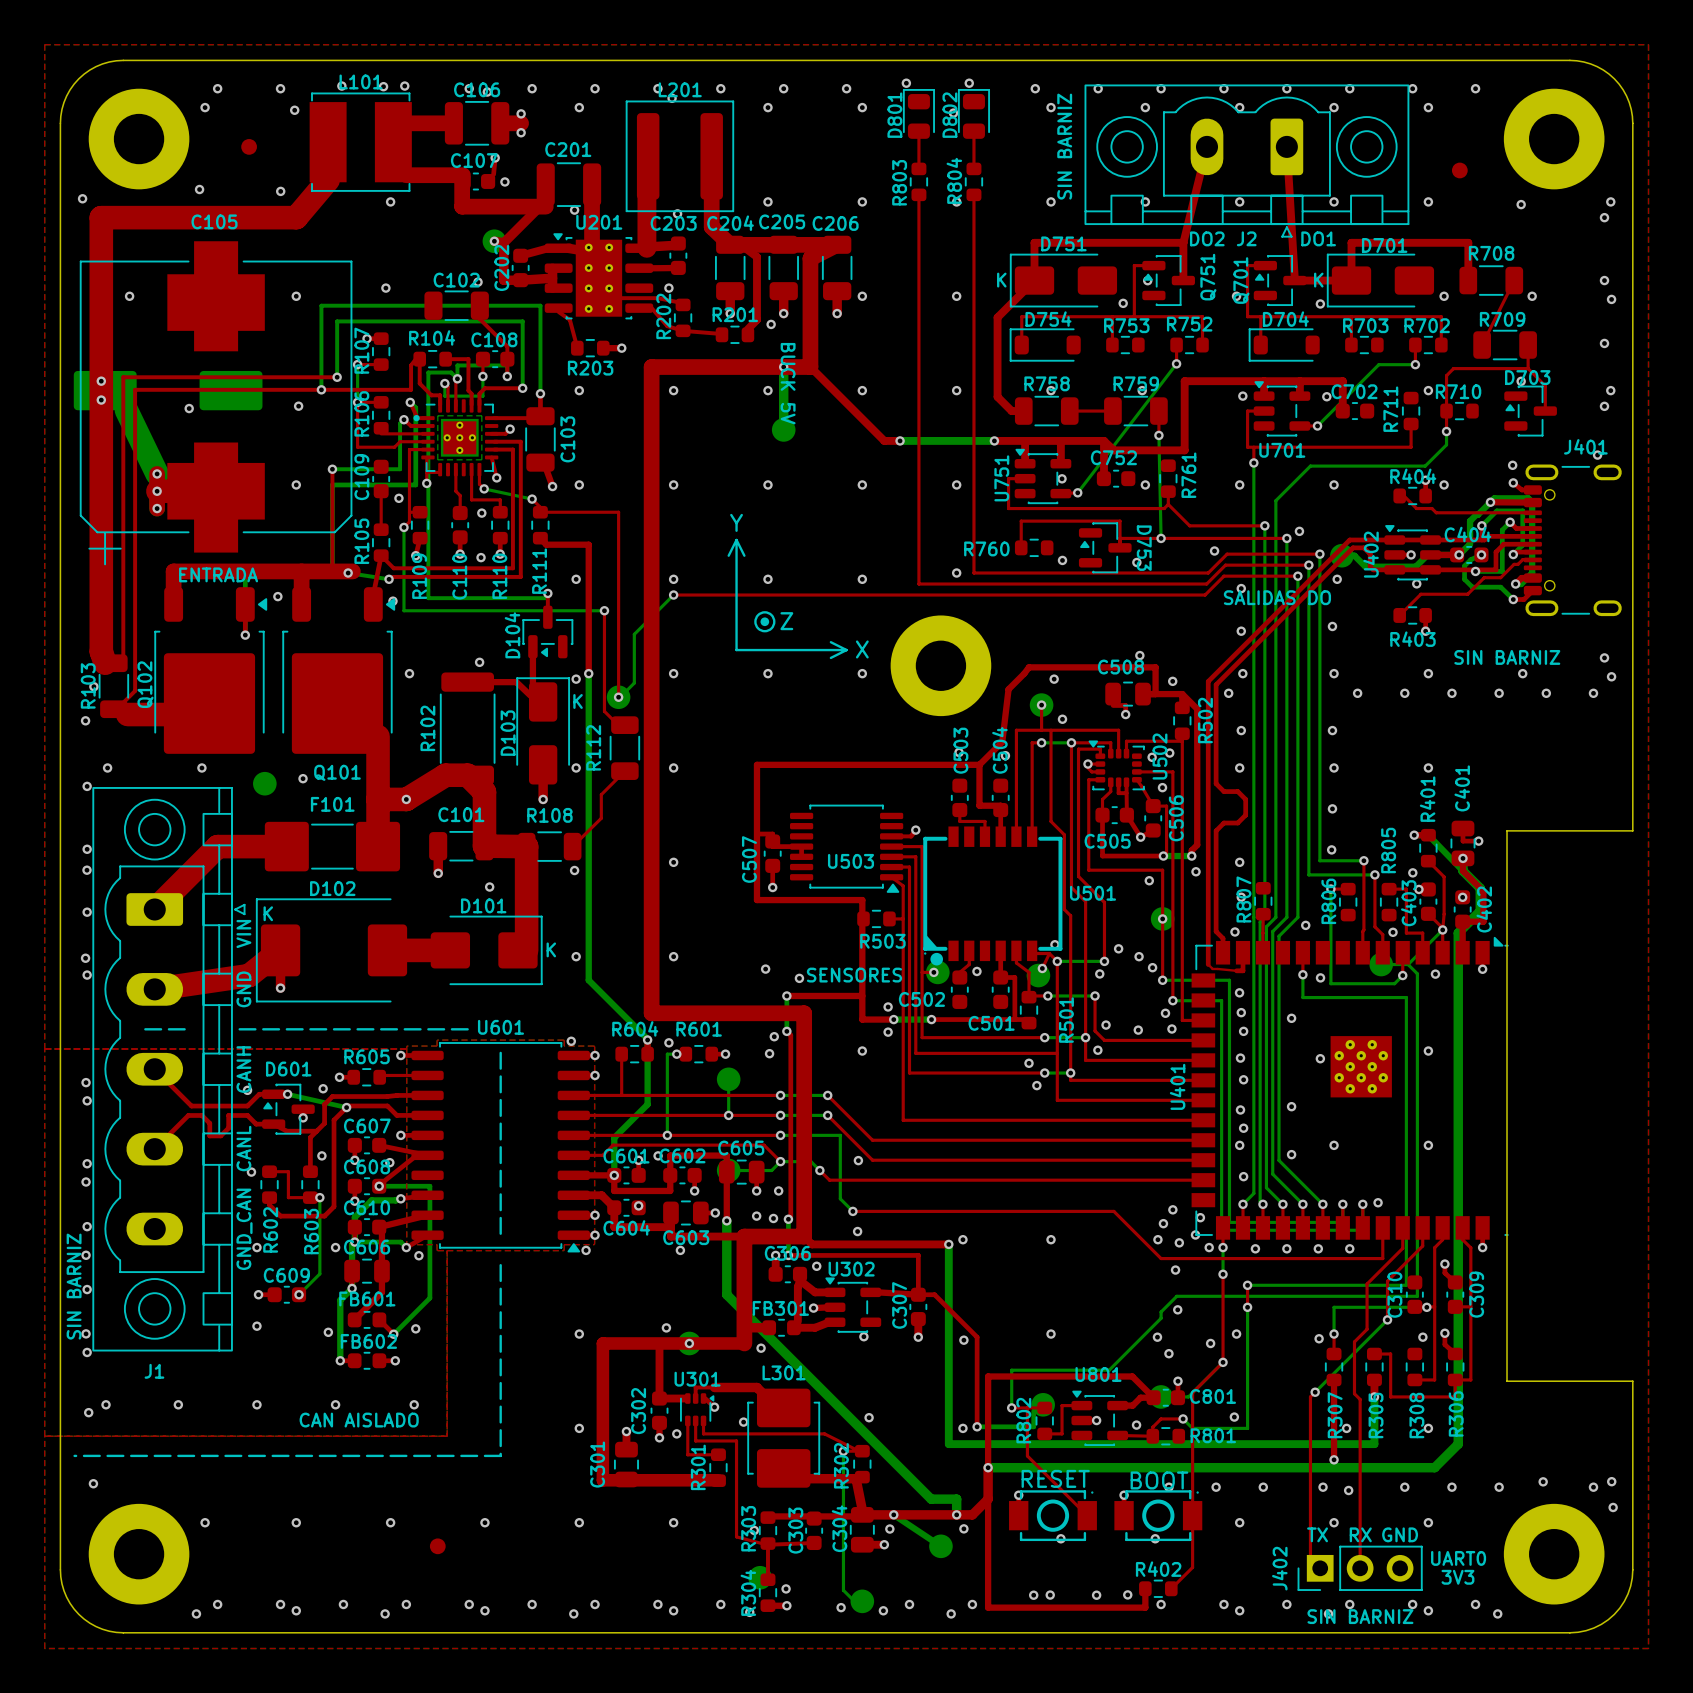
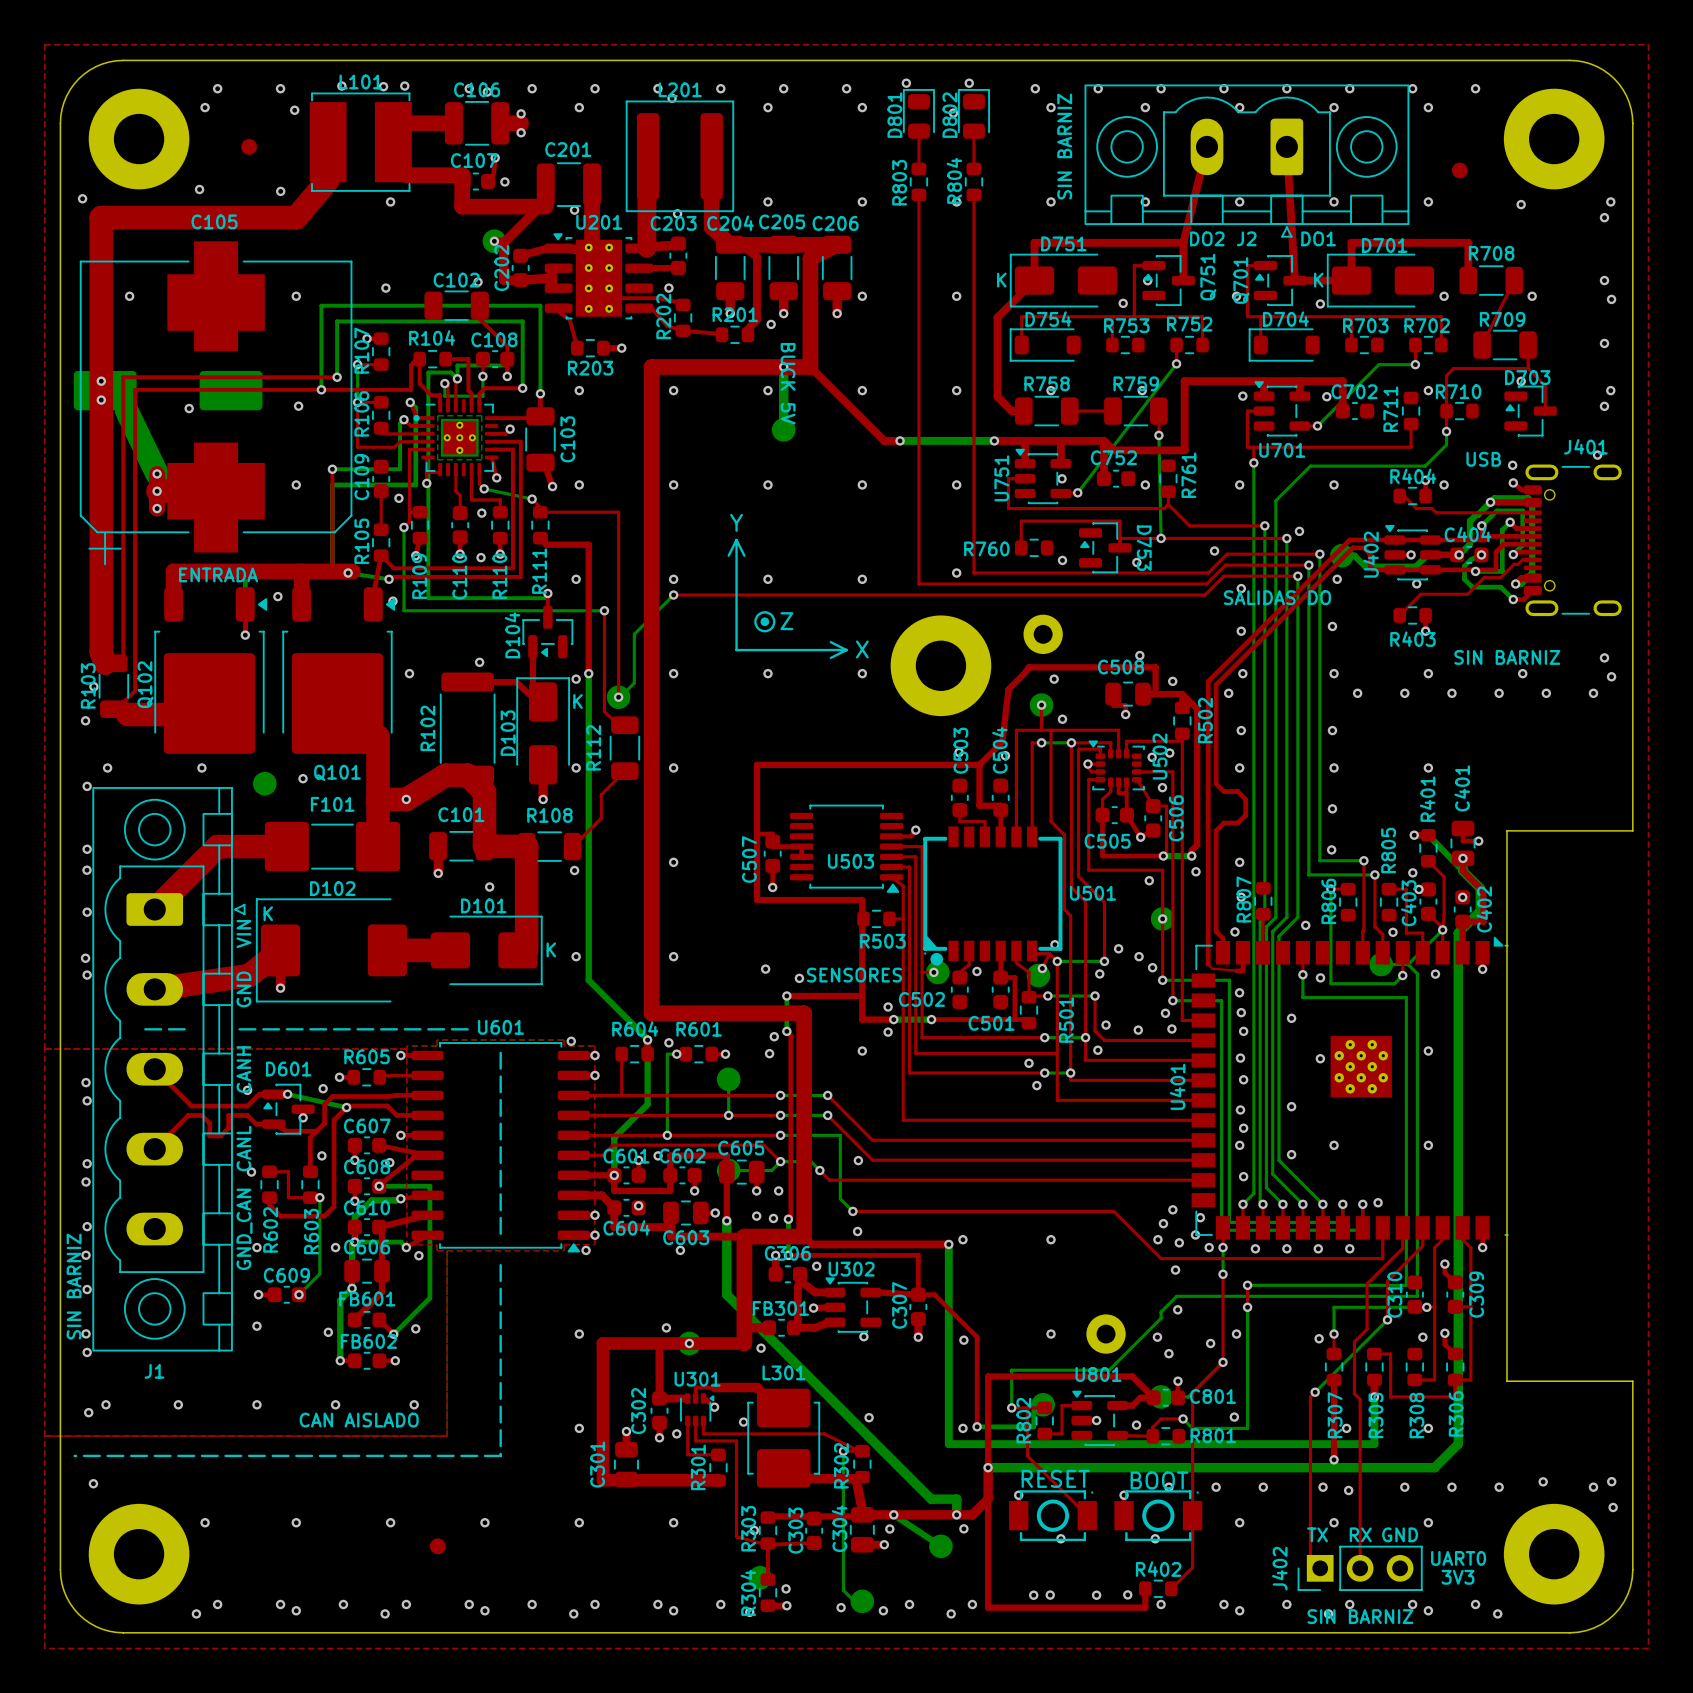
text: none -> USB (1483, 459)
part: none -> (1043, 634)
part: none -> (1106, 1334)

